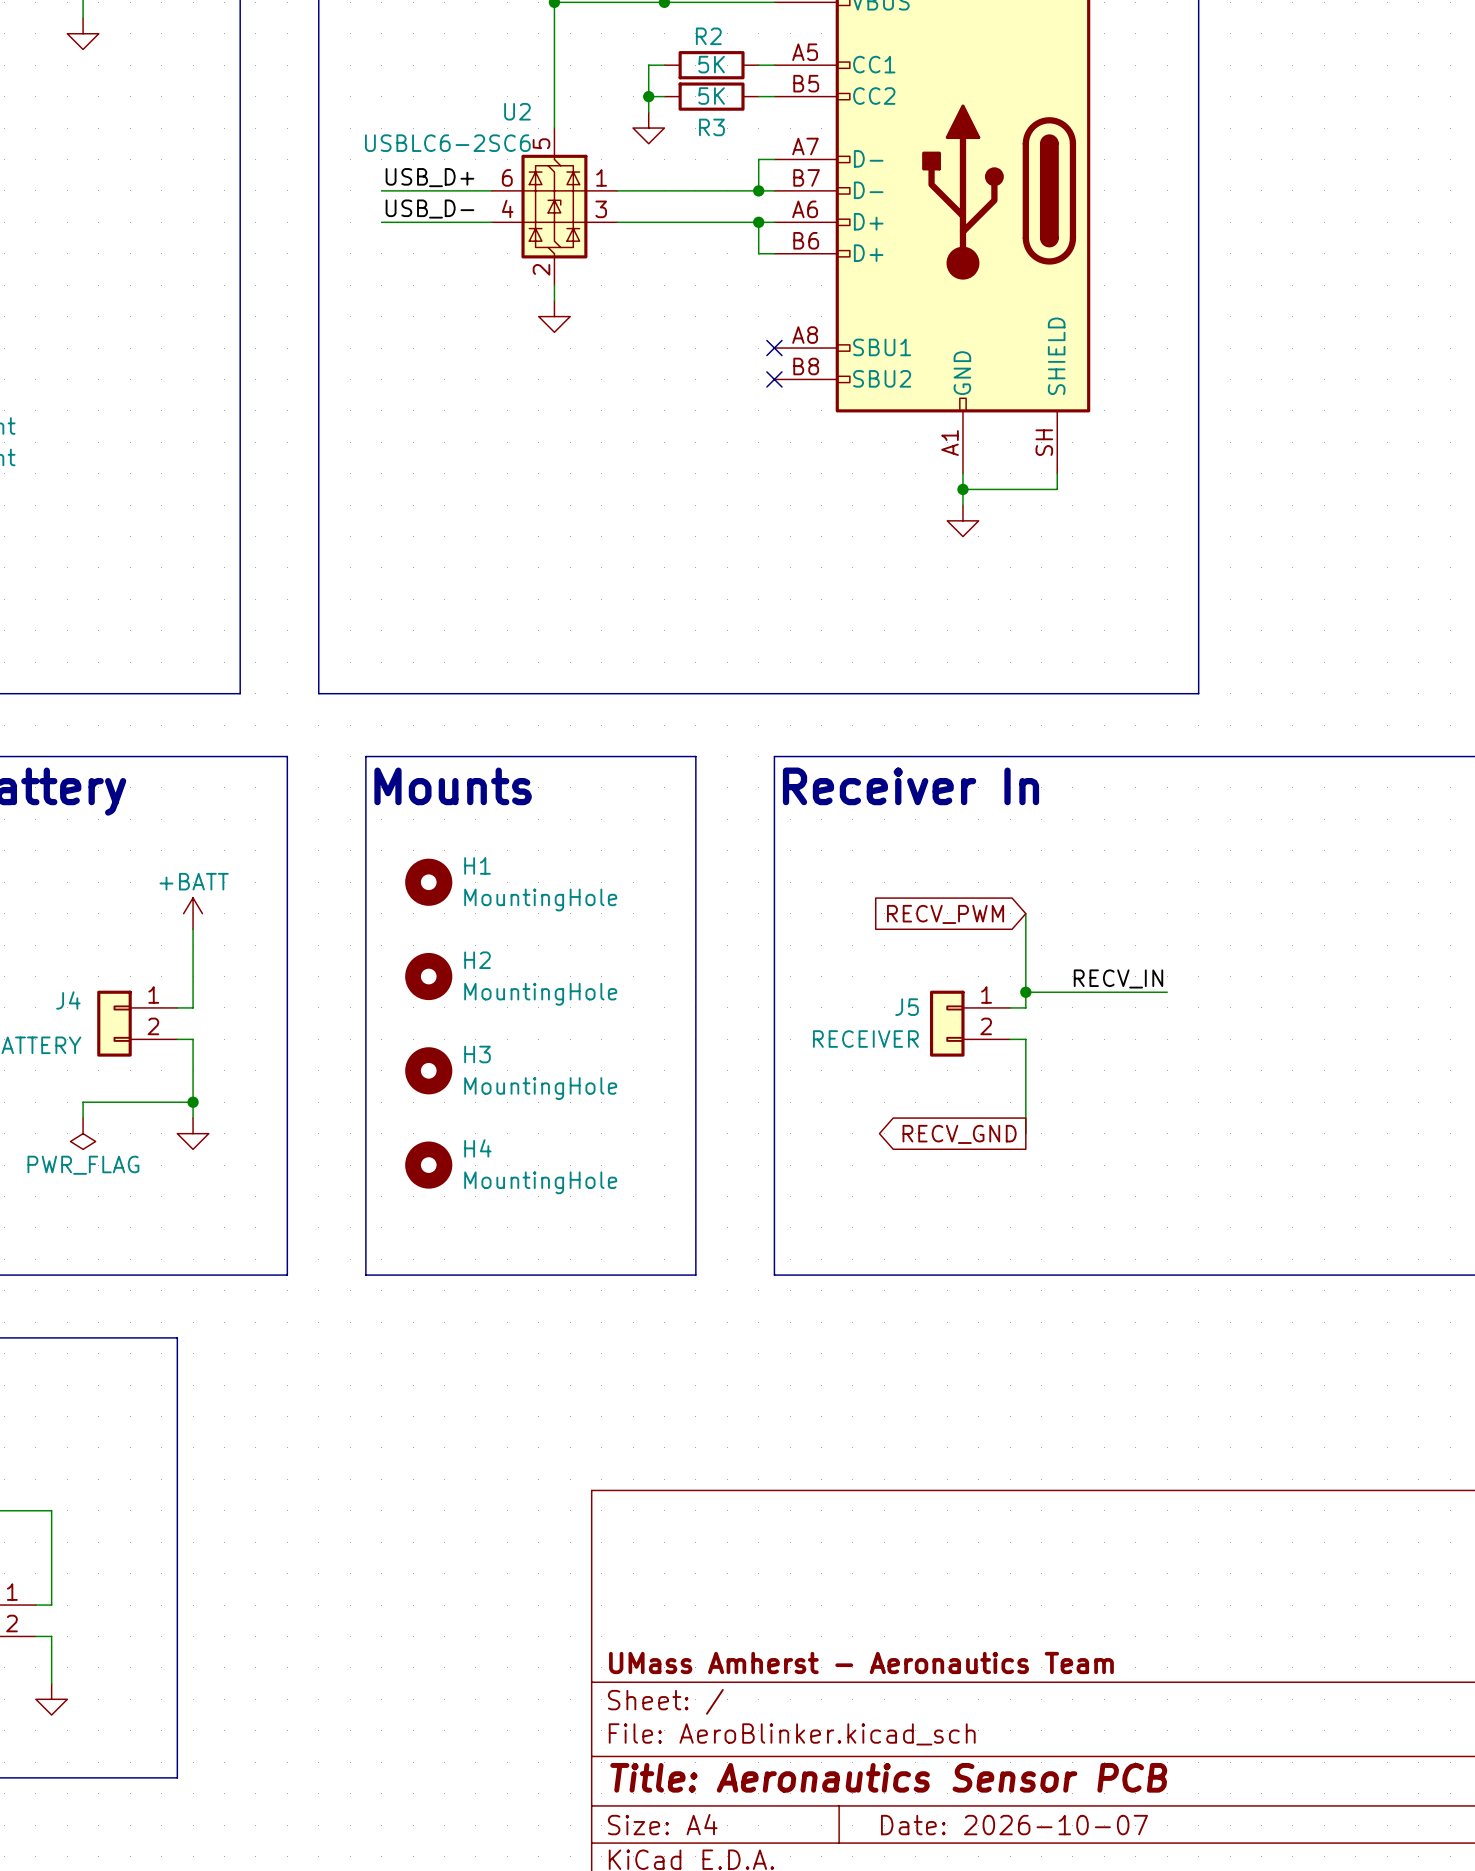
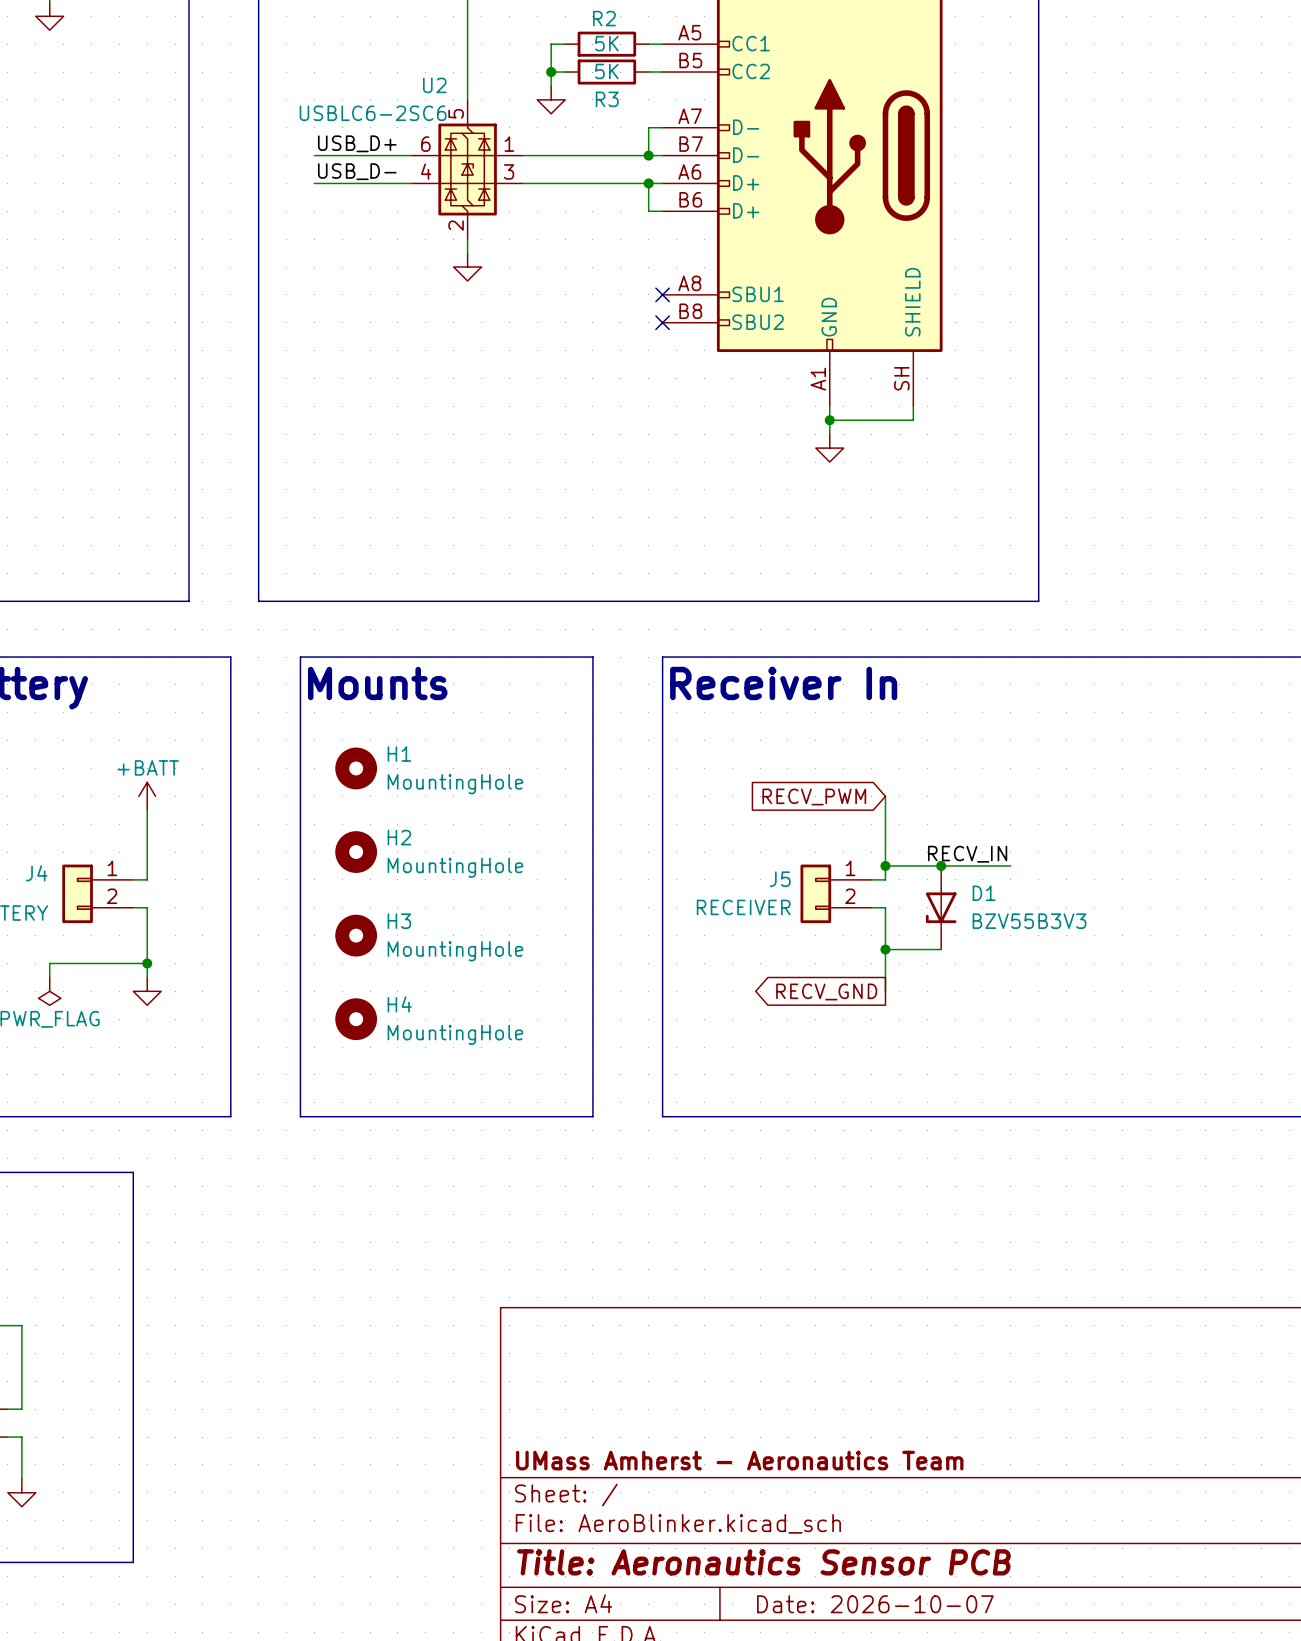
junction: none -> (941, 865)
D1: none -> BZV55B3V3 (941, 907)
wire: none -> (885, 949) (941, 949)
junction: none -> (885, 949)

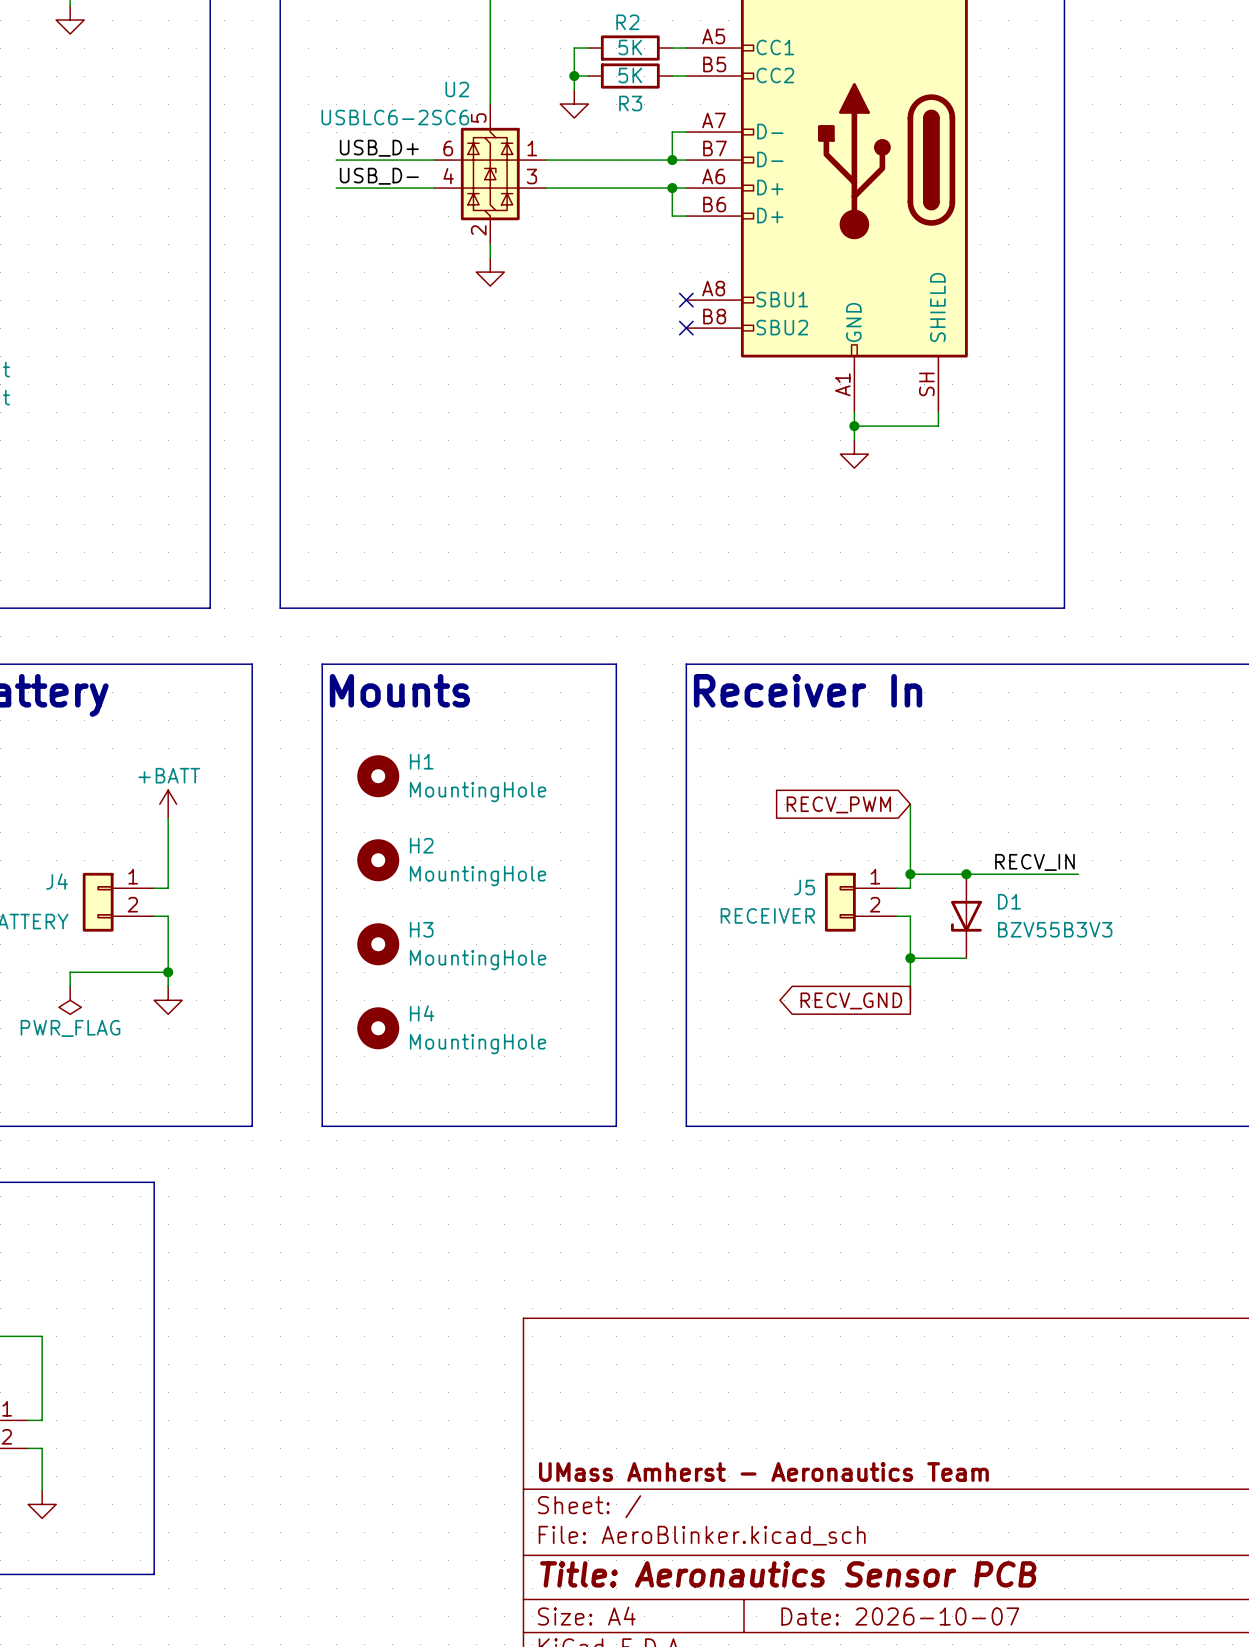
label position: RECV_IN (967, 854) -> RECV_IN (1034, 862)
wire: none -> (1036, 874) (1078, 874)

